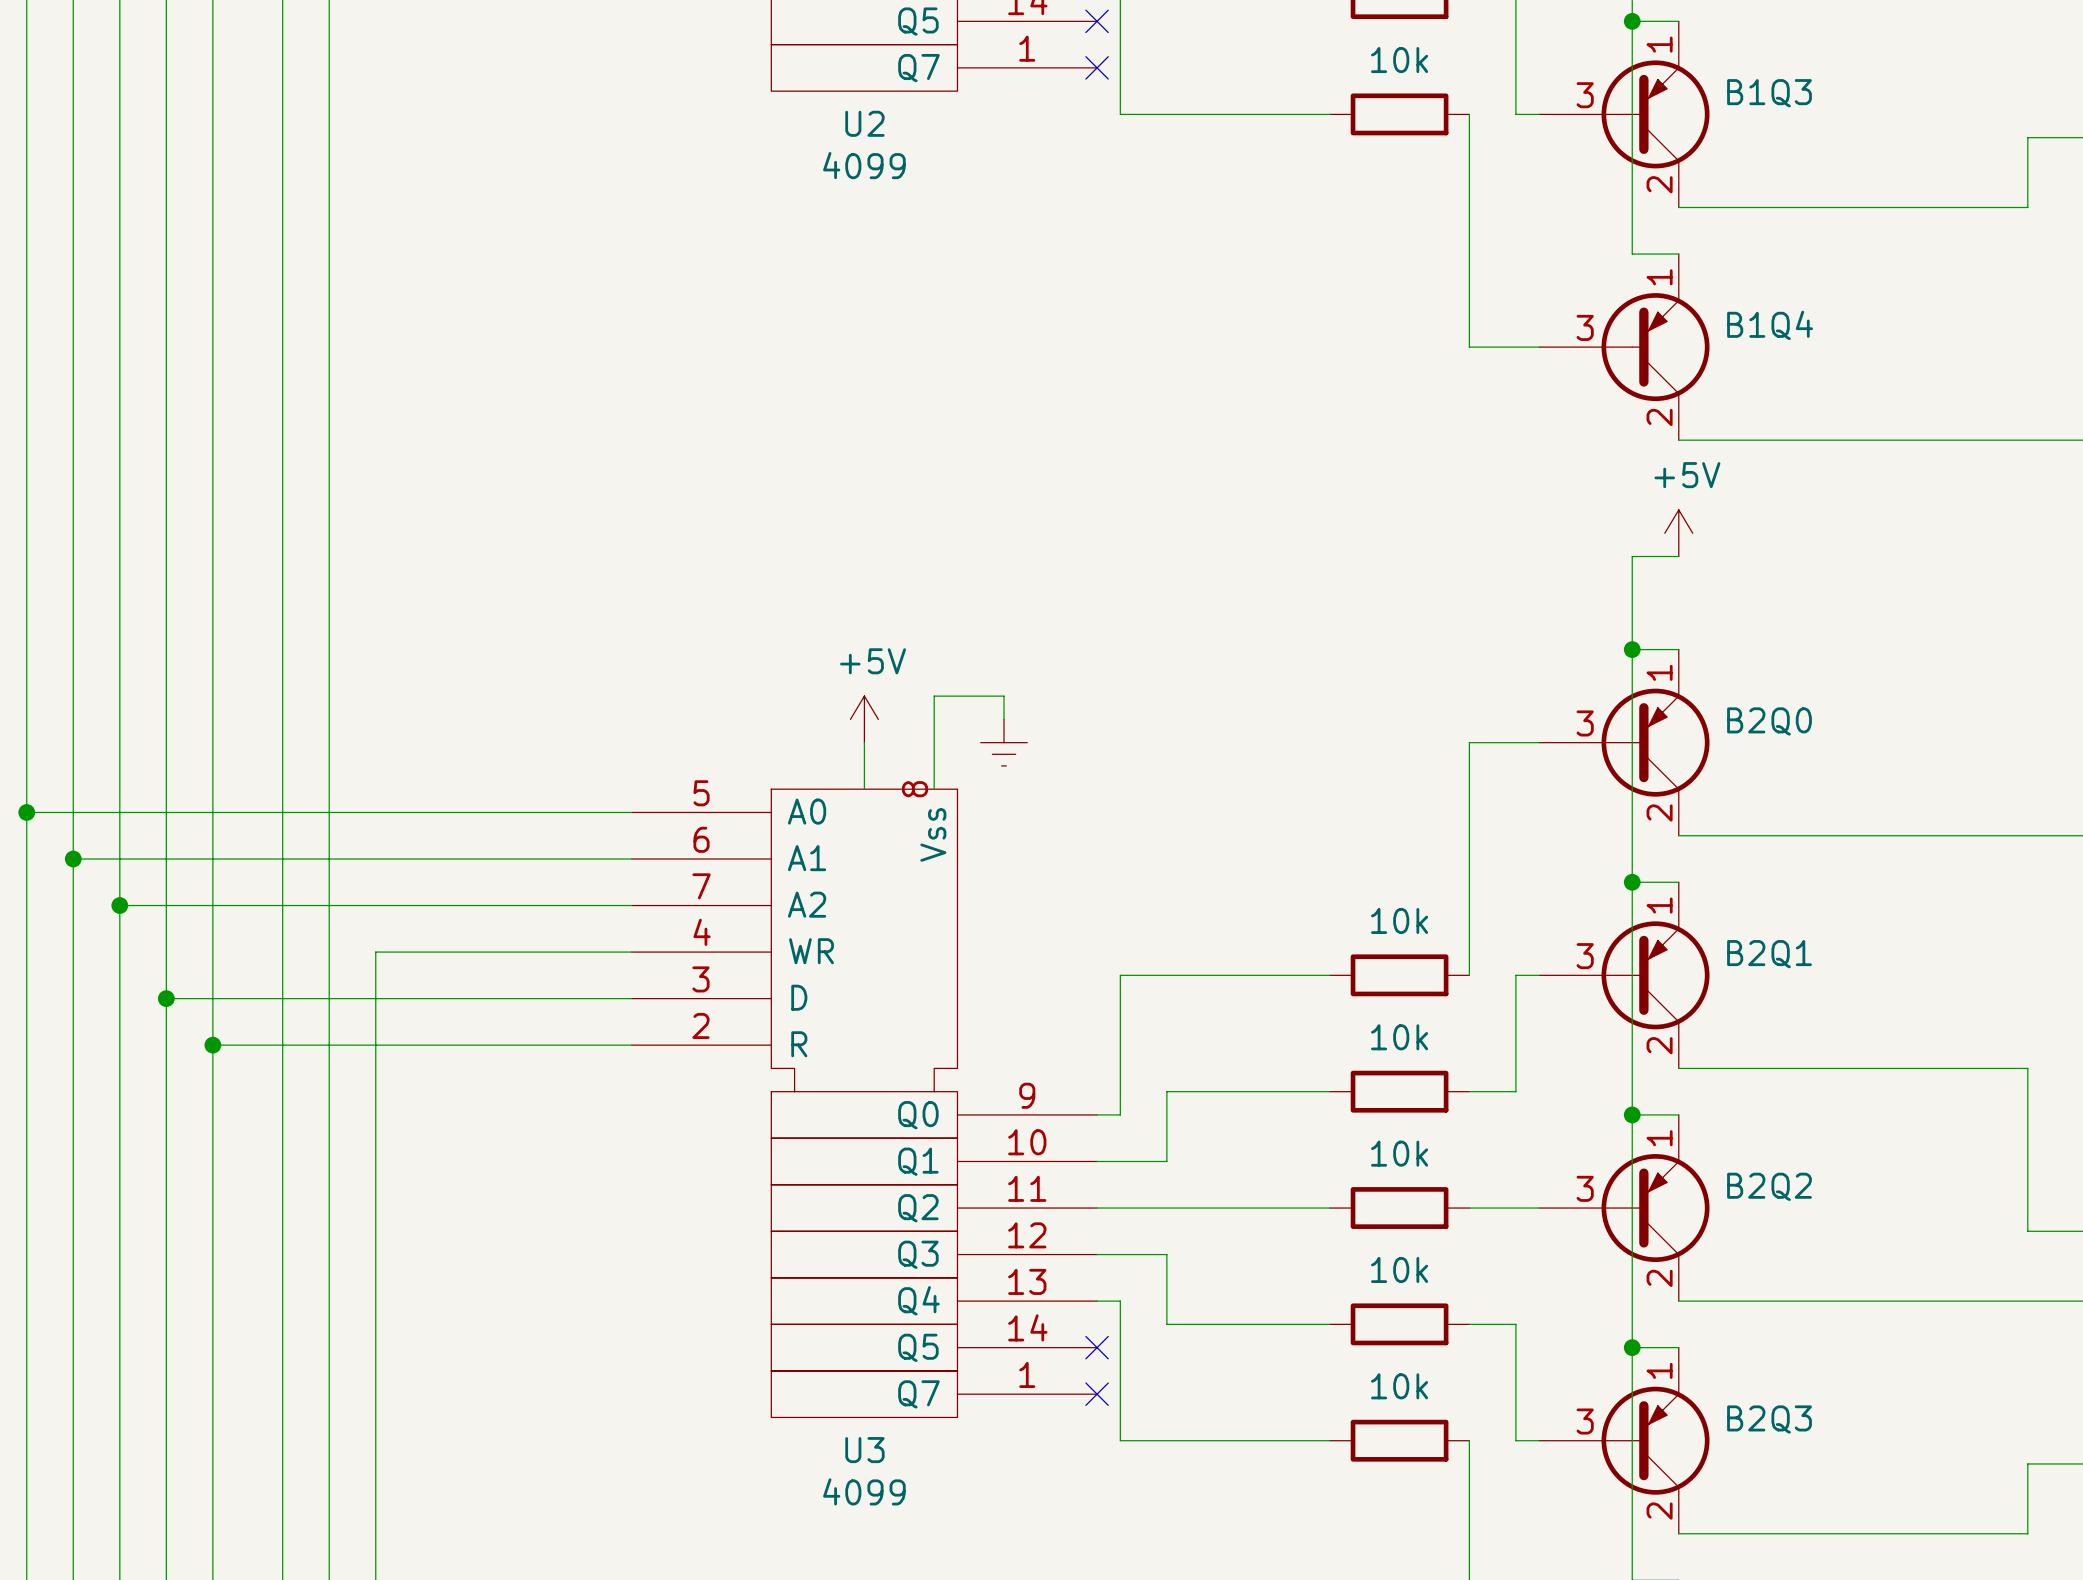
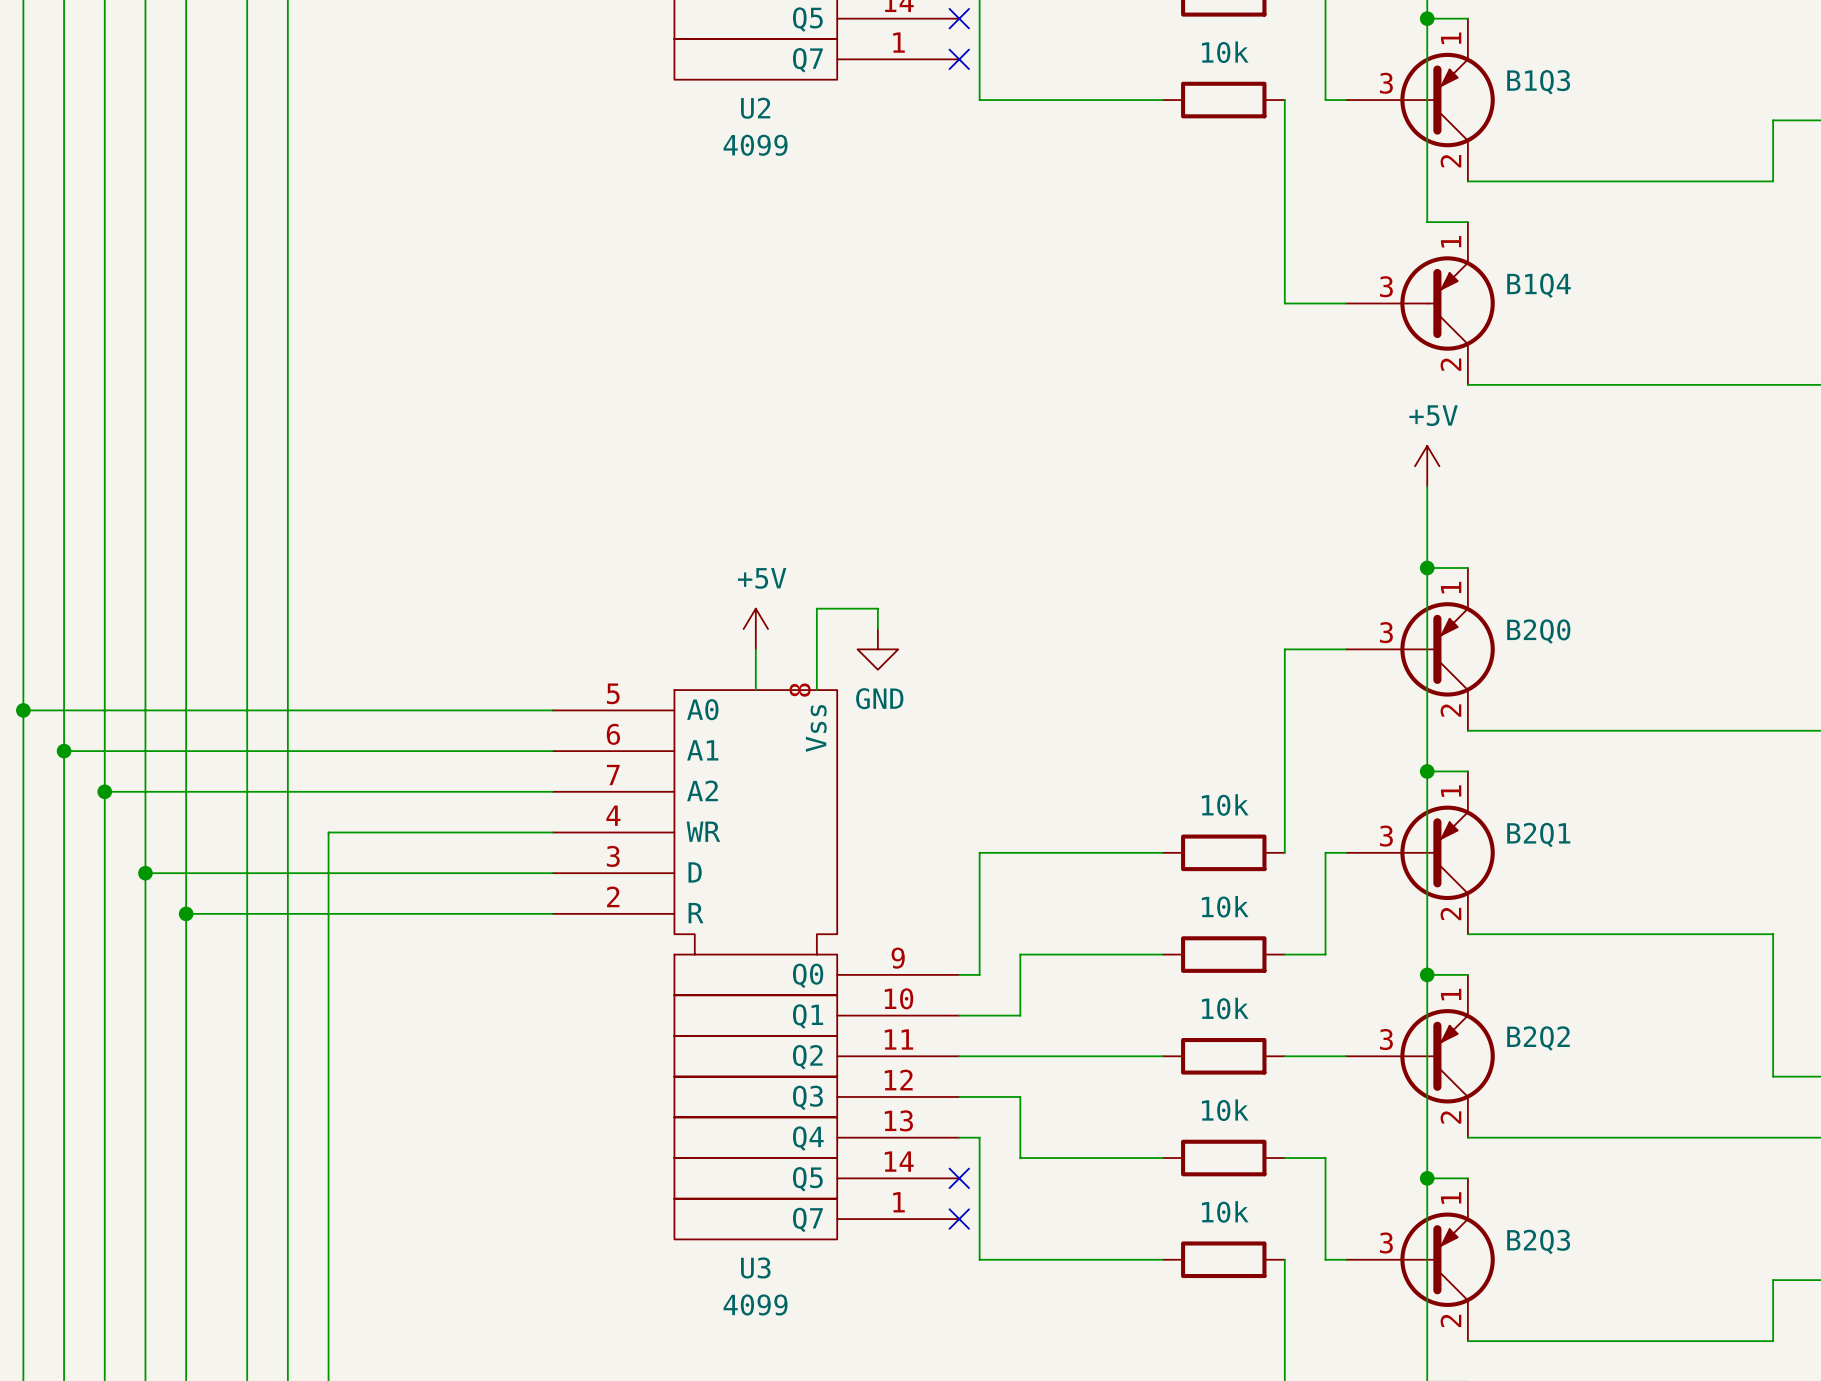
power symbol position: +5V (1678, 533) -> +5V (1427, 466)
wire: (1632, 556) (1678, 556) -> none
power symbol shape: [980, 719, 1028, 766] -> [857, 629, 899, 670]
power symbol text: none -> GND (879, 698)

